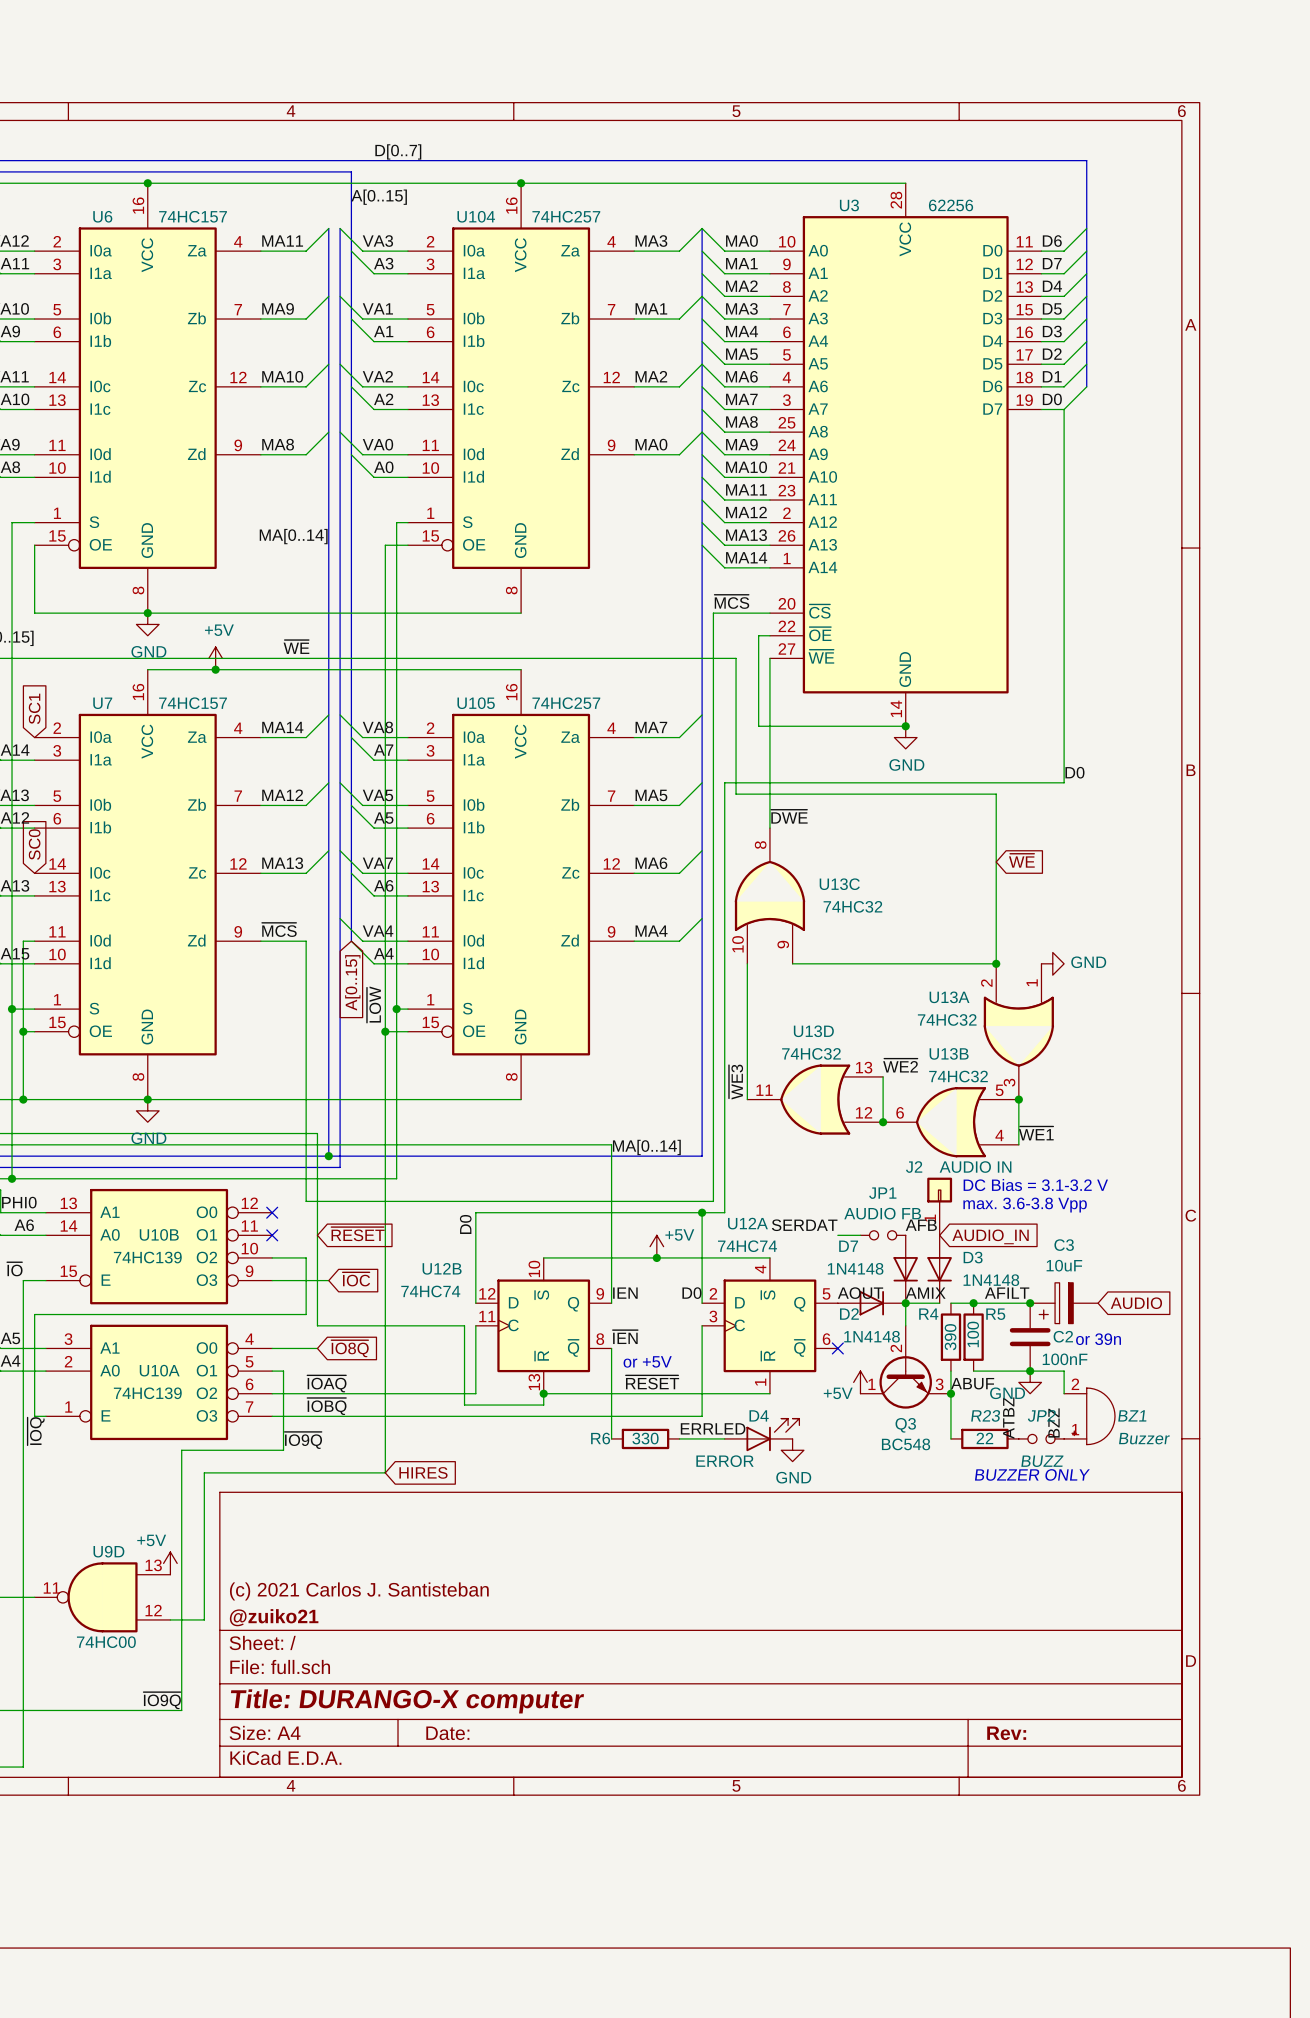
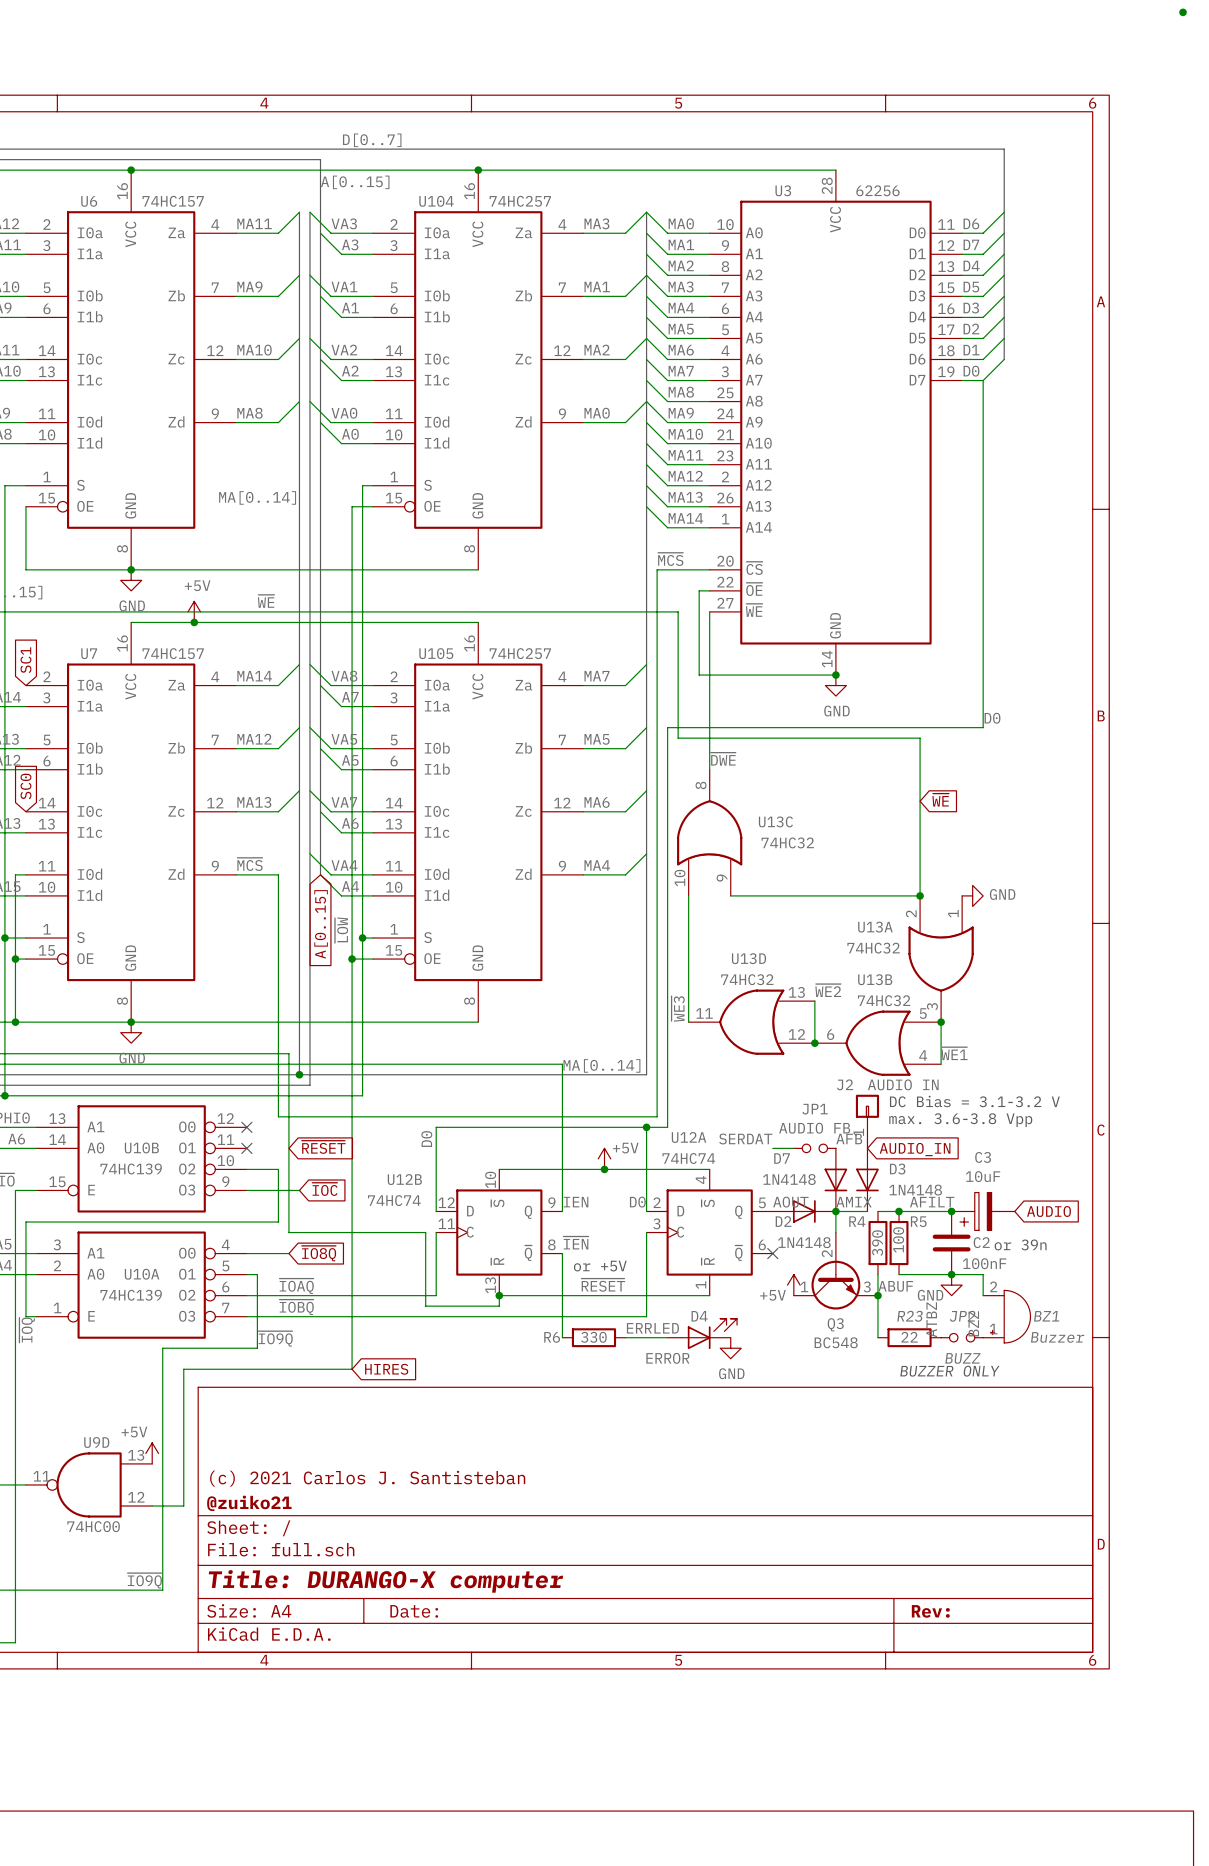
junction: none -> (1183, 12)

